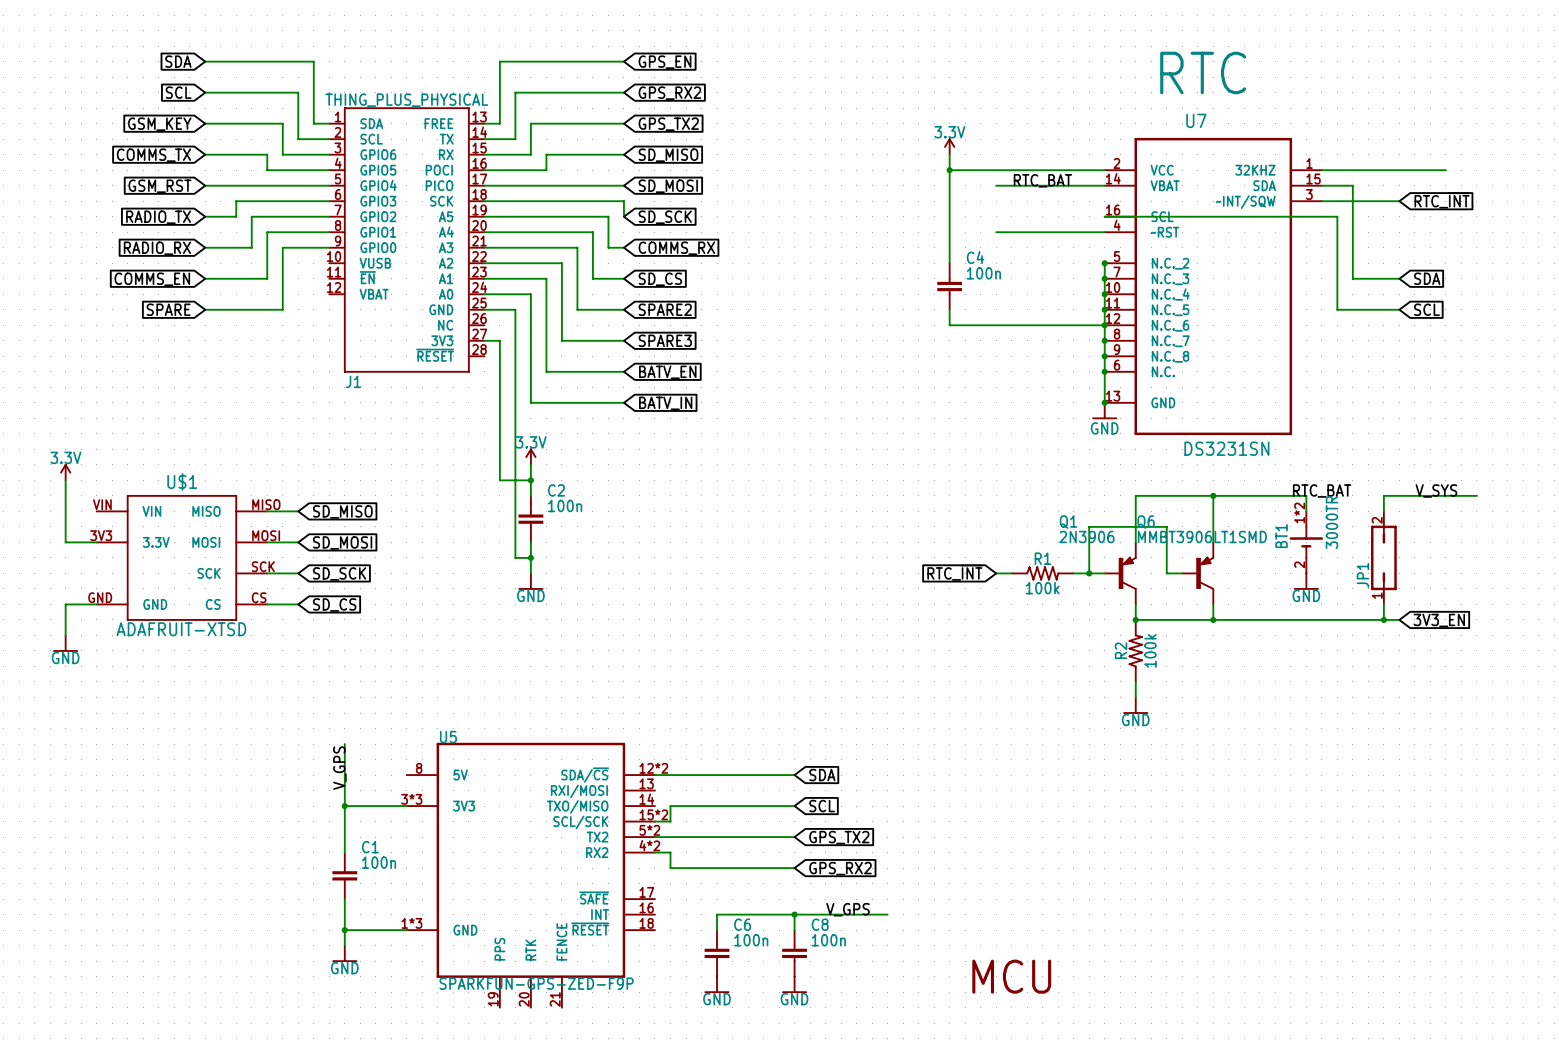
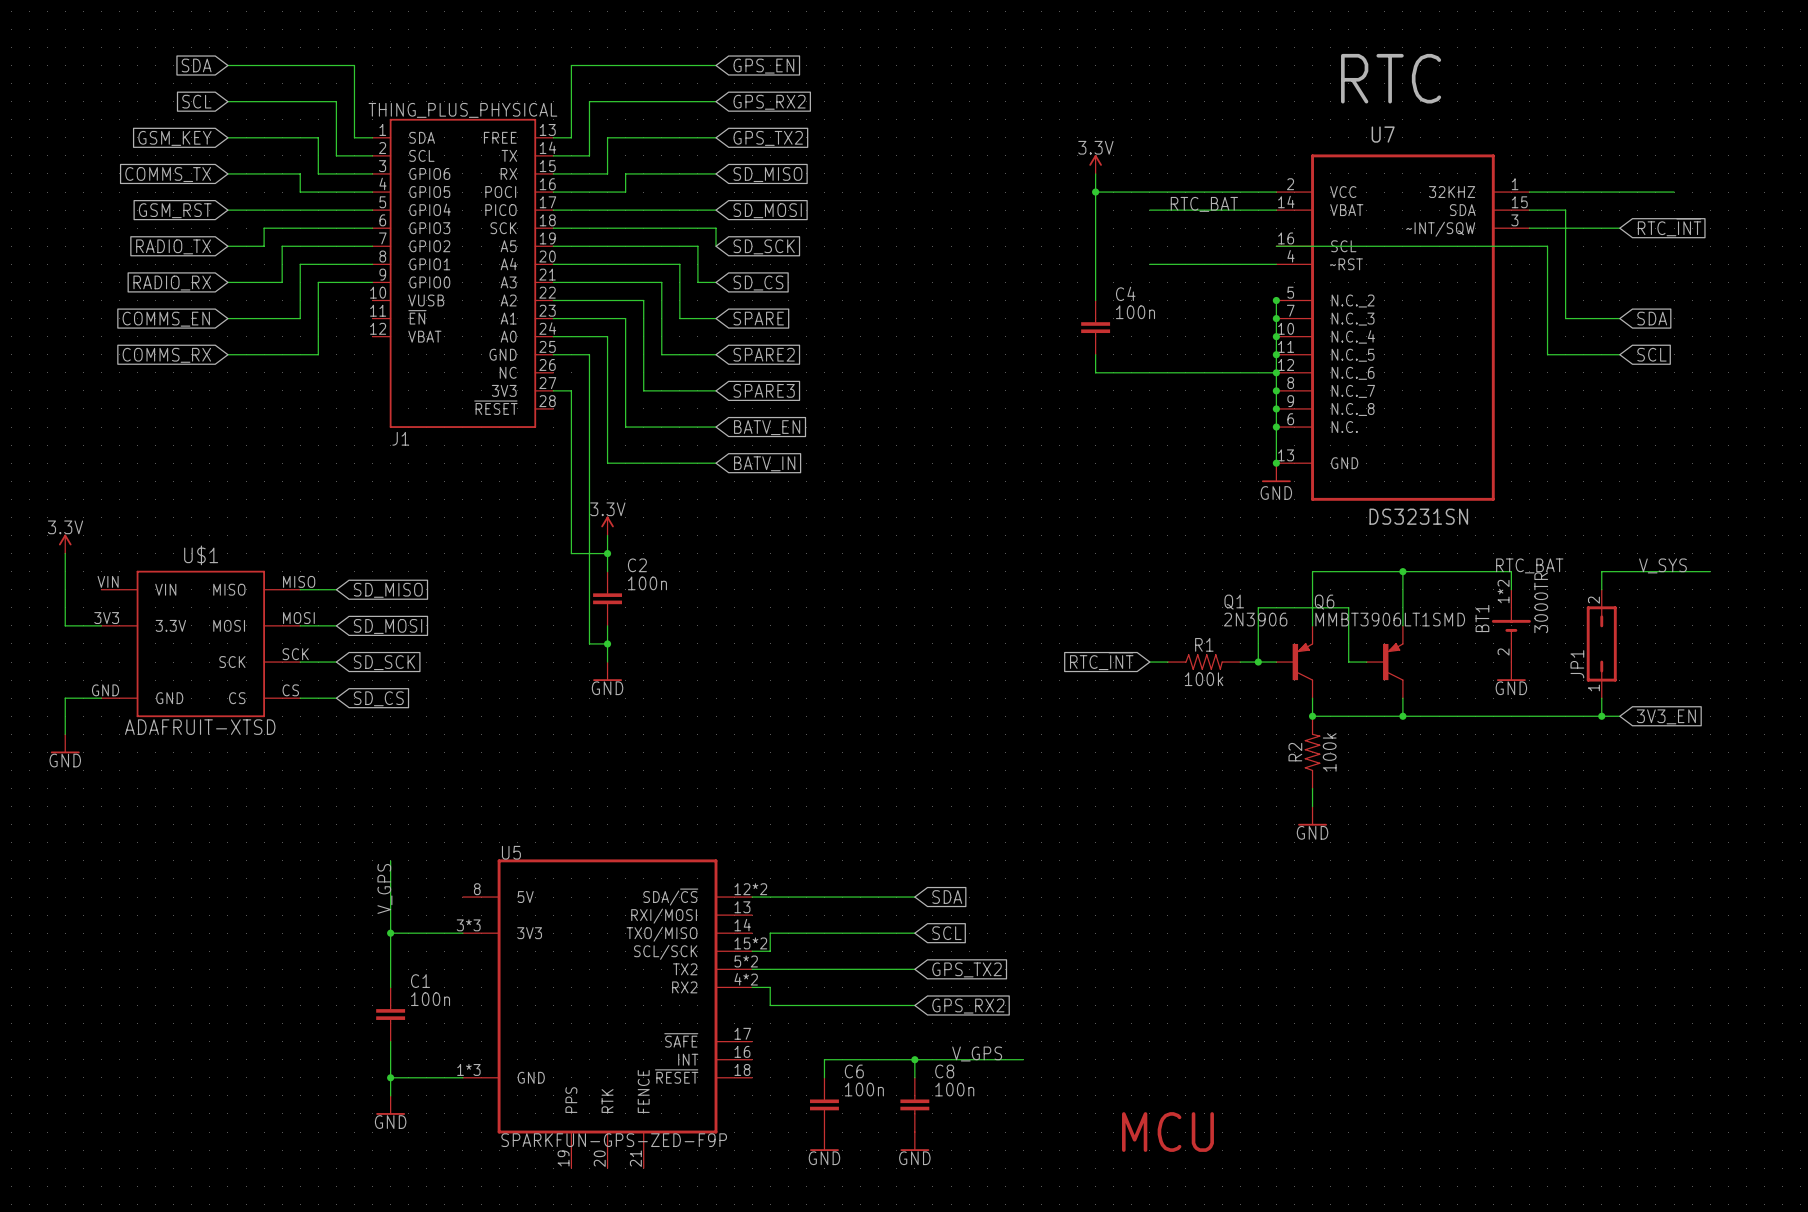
global label: COMMS_RX (676, 248) -> SD_CS (758, 283)
global label: SD_CS (660, 279) -> SPARE (758, 318)
global label: SPARE (168, 309) -> COMMS_RX (166, 355)

